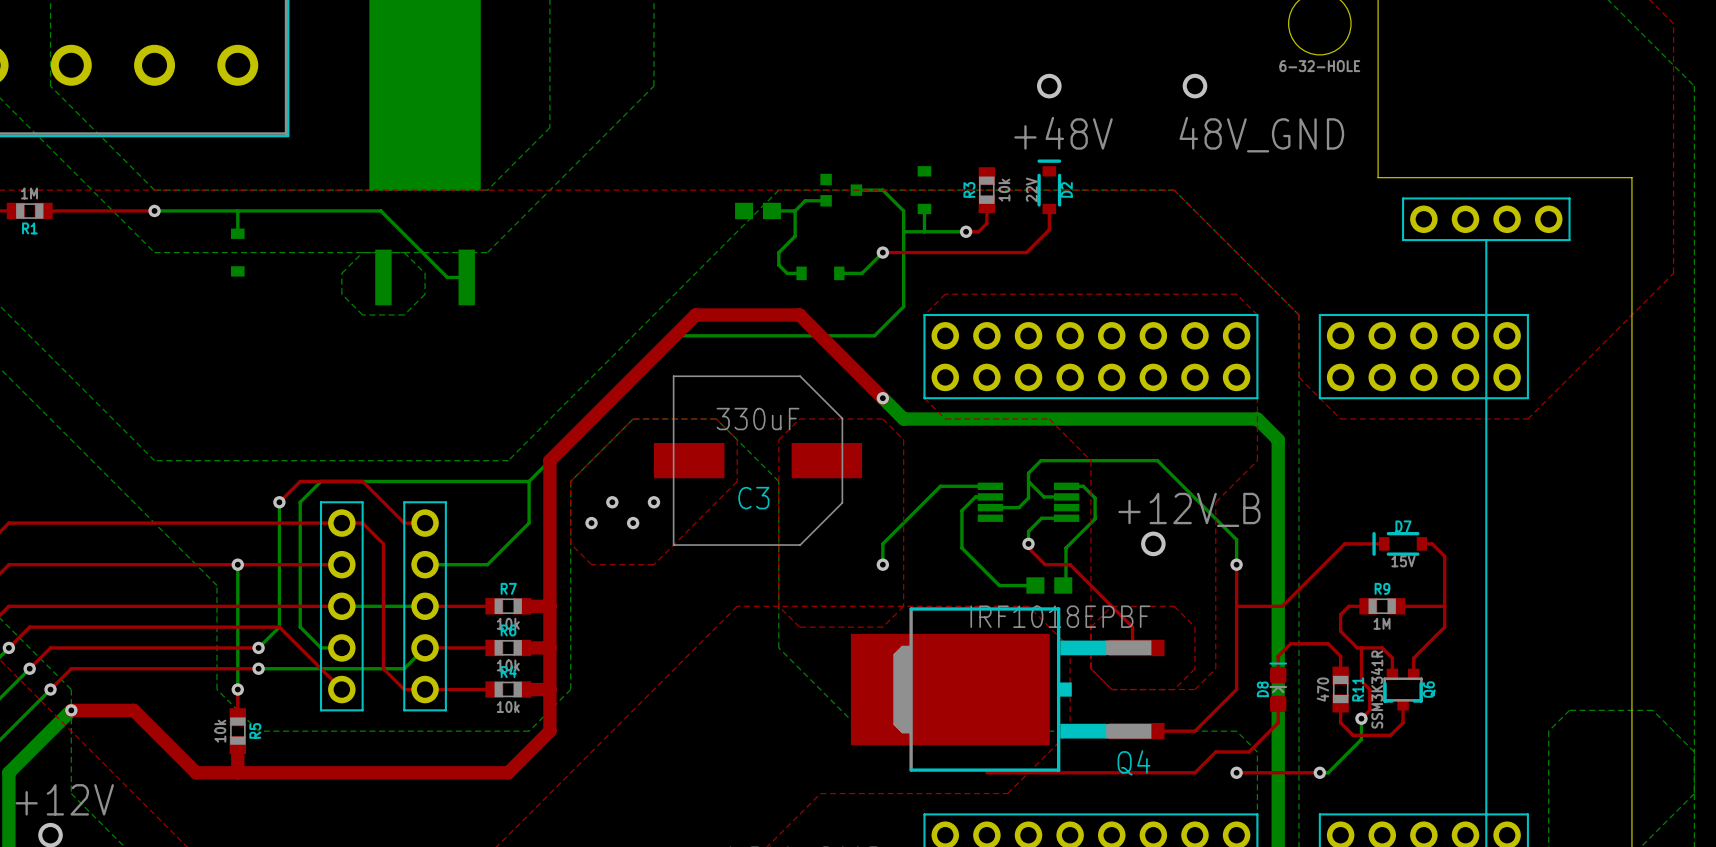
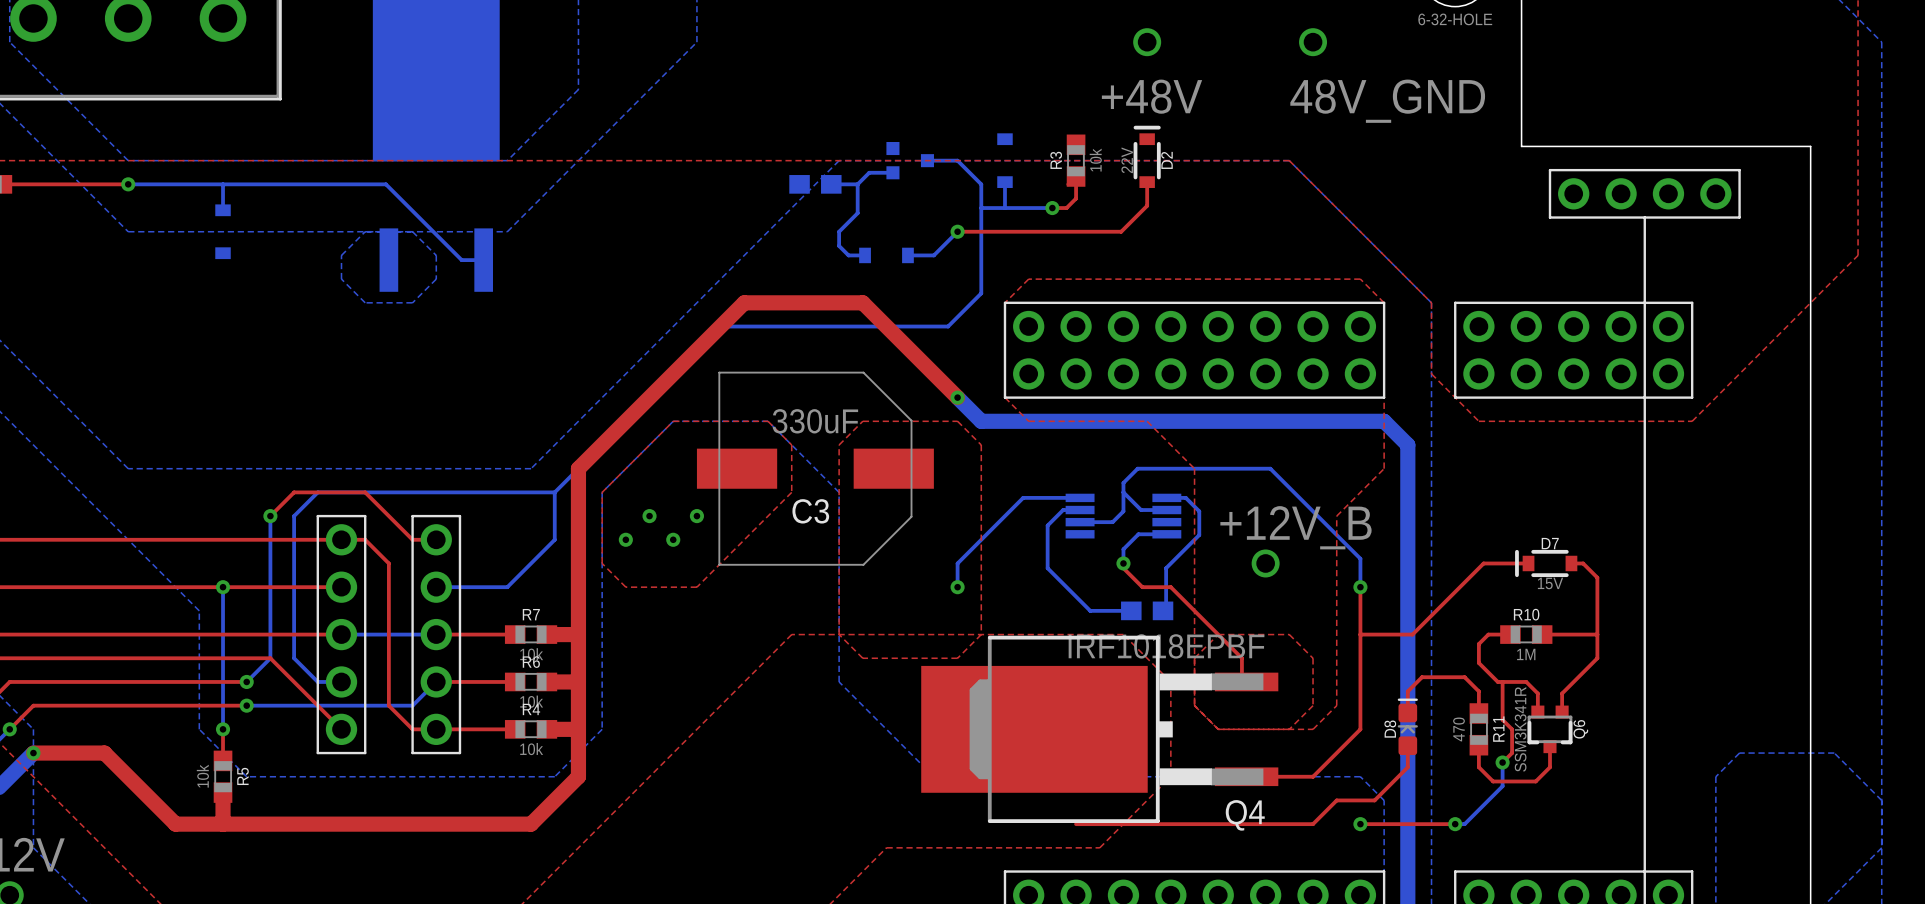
R9 name: R9 (1382, 588) -> R10 (1526, 614)

